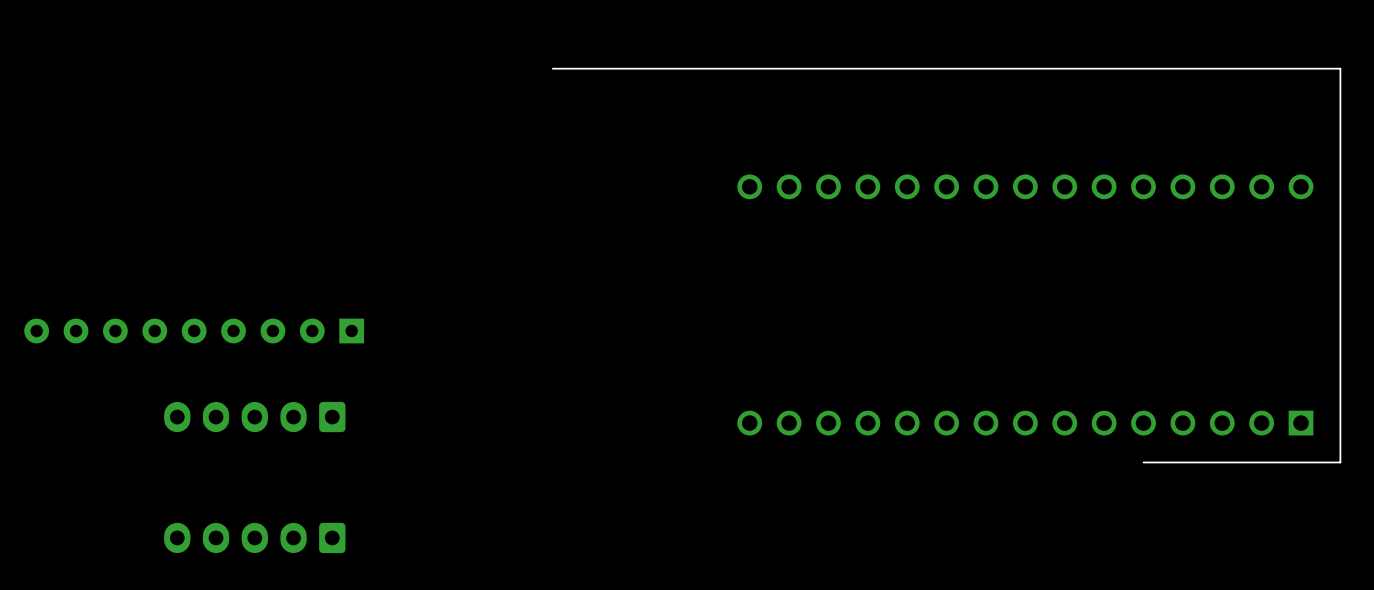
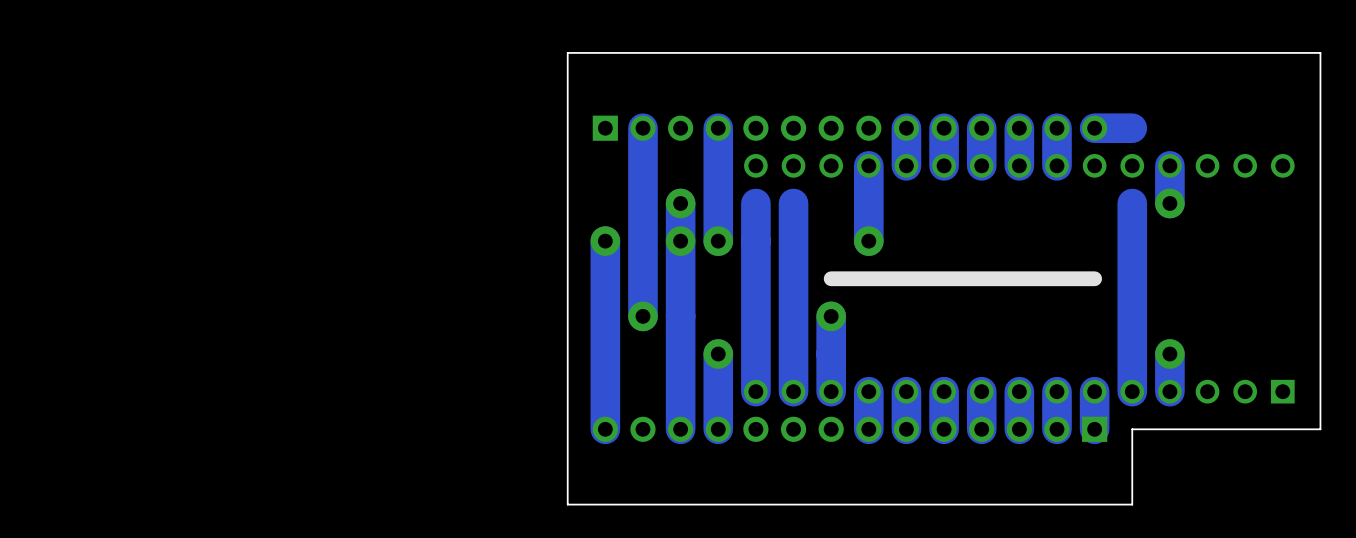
board edge: none -> (567, 52) (567, 504) (1132, 504) (1132, 429)
track: none -> (642, 128) (642, 316)
track: none -> (718, 128) (718, 241)
part: none -> (849, 128)
track: none -> (906, 128) (906, 165)
track: none -> (944, 128) (944, 165)
track: none -> (981, 128) (981, 165)
track: none -> (1019, 128) (1019, 165)
track: none -> (1056, 128) (1056, 165)
track: none -> (1132, 128) (1094, 128)
track: none -> (868, 165) (868, 241)
track: none -> (1169, 165) (1169, 203)
track: none -> (680, 203) (680, 429)
via: none -> (680, 203)
track: none -> (755, 203) (755, 391)
track: none -> (793, 203) (793, 391)
track: none -> (1132, 203) (1132, 391)
via: none -> (1169, 203)
track: none -> (605, 241) (605, 429)
via: none -> (605, 241)
via: none -> (680, 241)
via: none -> (718, 241)
via: none -> (868, 241)
line: none -> (1094, 278) (831, 278)
part: (194, 331) -> none
via: none -> (642, 316)
track: none -> (831, 316) (831, 391)
via: none -> (831, 316)
track: none -> (718, 354) (718, 429)
via: none -> (718, 354)
track: none -> (1169, 354) (1169, 391)
via: none -> (1169, 354)
part: (254, 417) -> none
track: none -> (868, 391) (868, 429)
track: none -> (906, 391) (906, 429)
track: none -> (944, 391) (944, 429)
track: none -> (981, 391) (981, 429)
track: none -> (1019, 391) (1019, 429)
track: none -> (1056, 391) (1056, 429)
track: none -> (1094, 391) (1094, 429)
part: none -> (849, 429)
part: (254, 537) -> none

